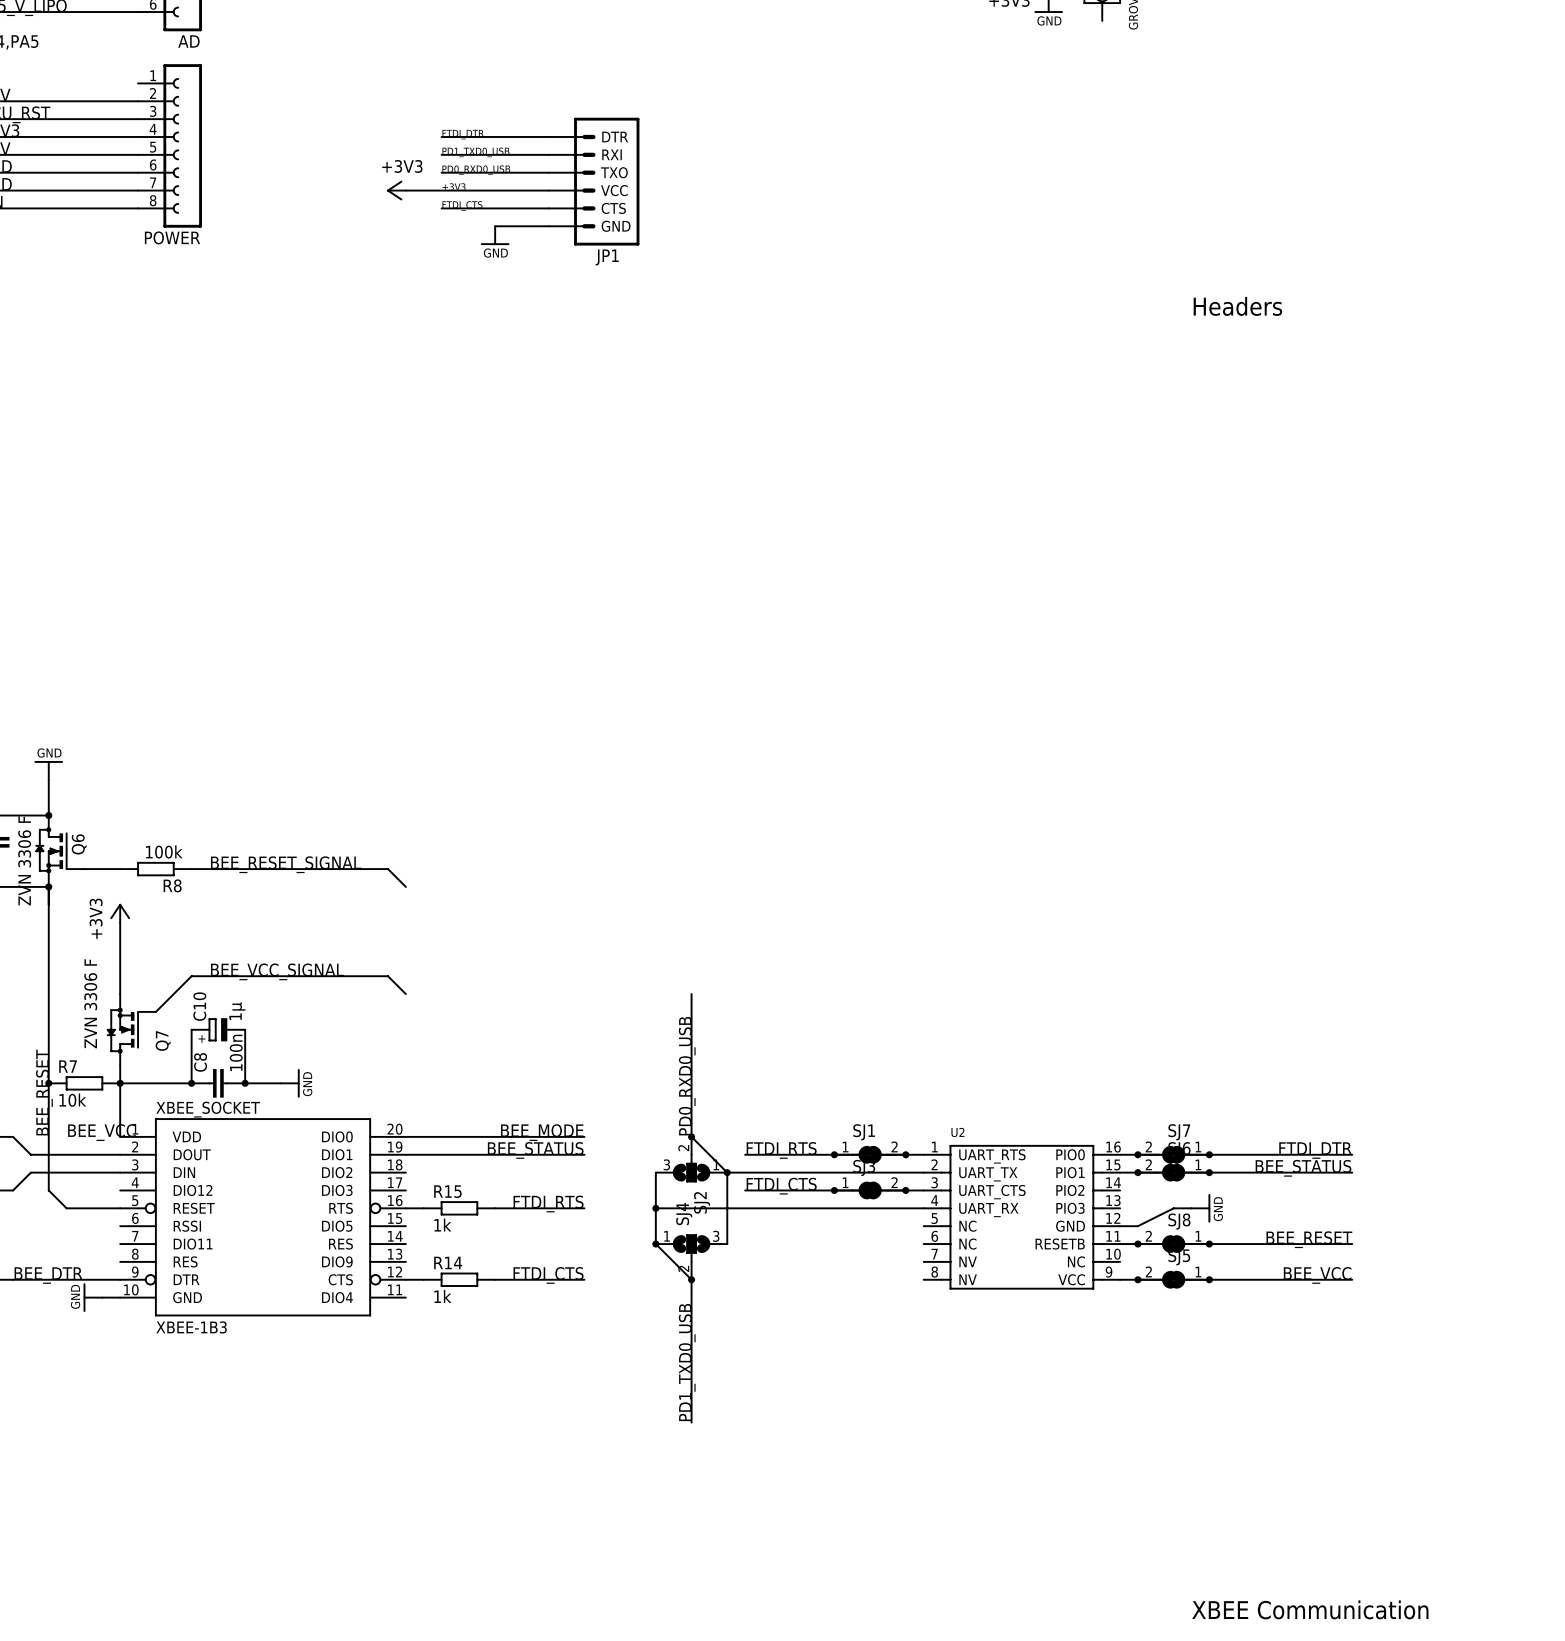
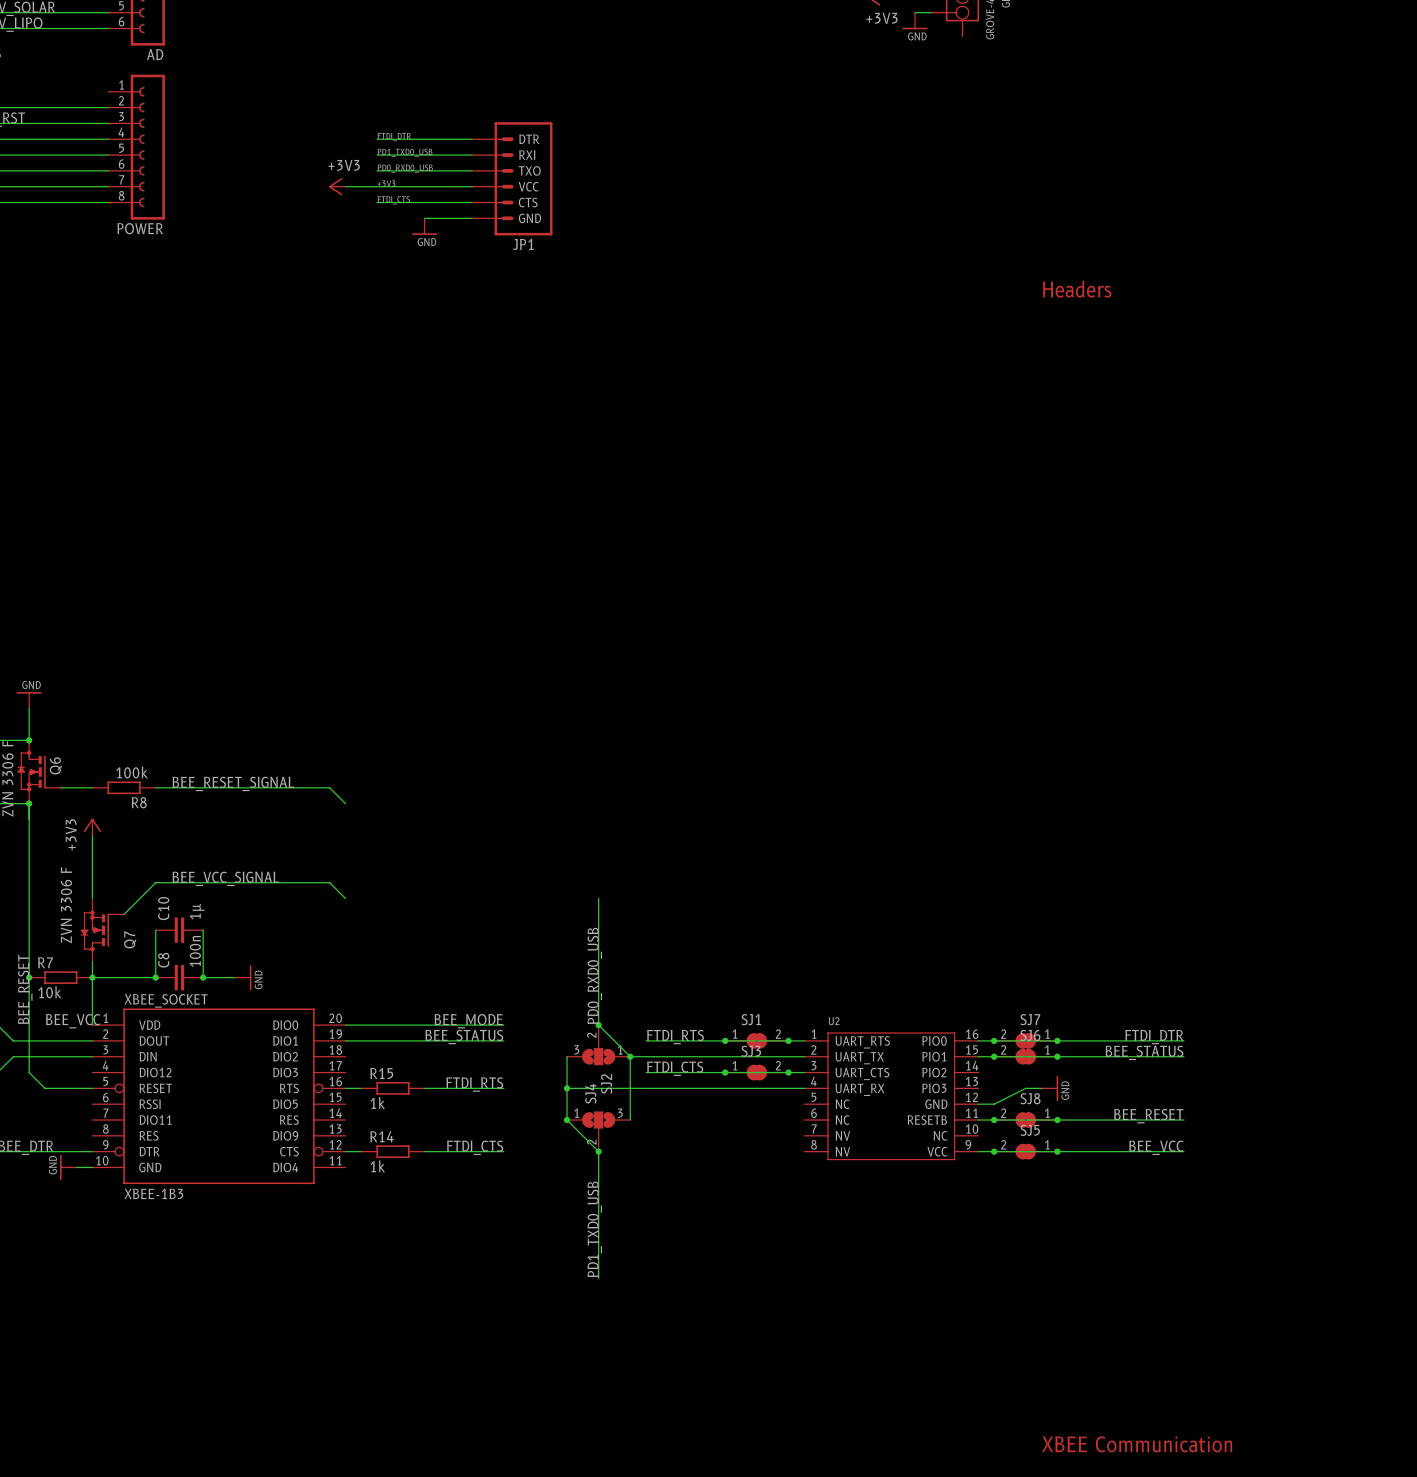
C10 symbol: [191, 1018, 246, 1042] -> [155, 917, 204, 943]

